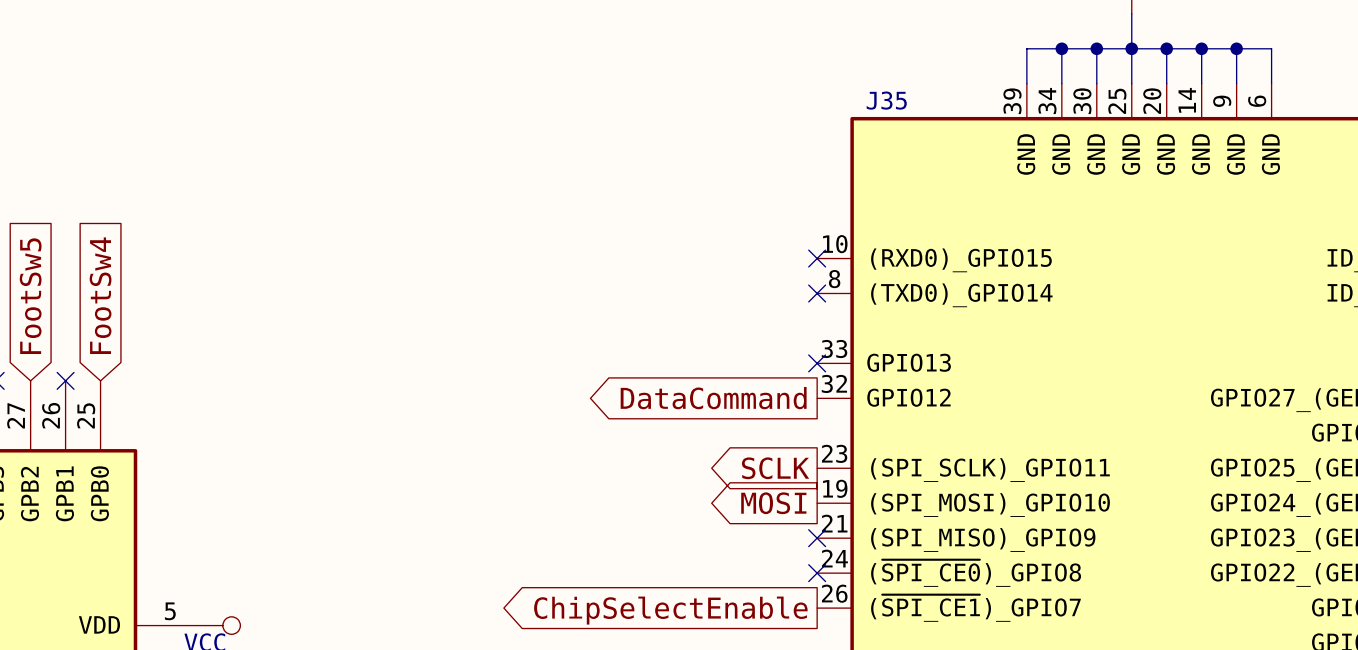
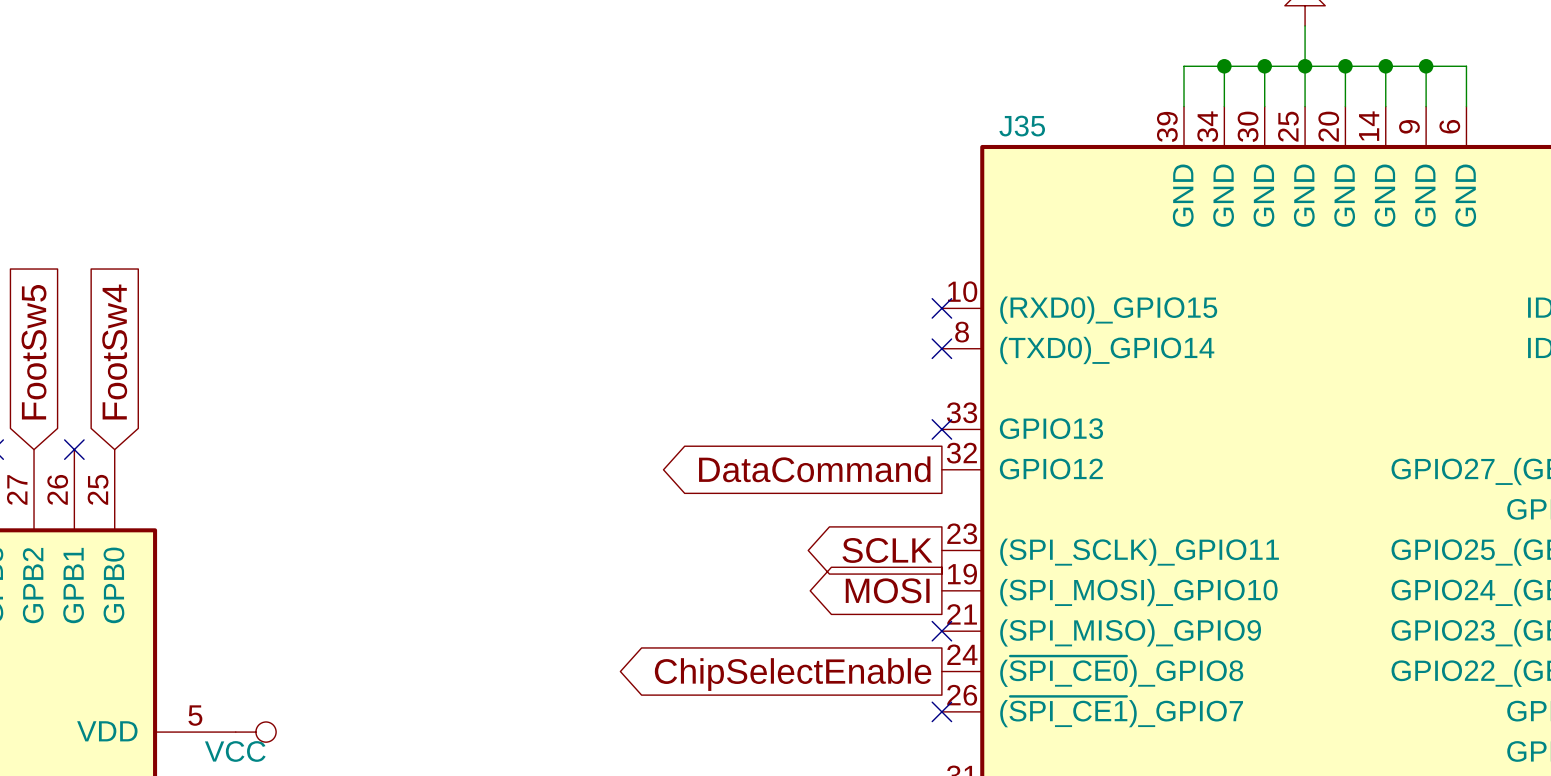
no-connect mark position: (817, 573) -> (941, 711)
global label position: ChipSelectEnable (670, 610) -> ChipSelectEnable (793, 674)

